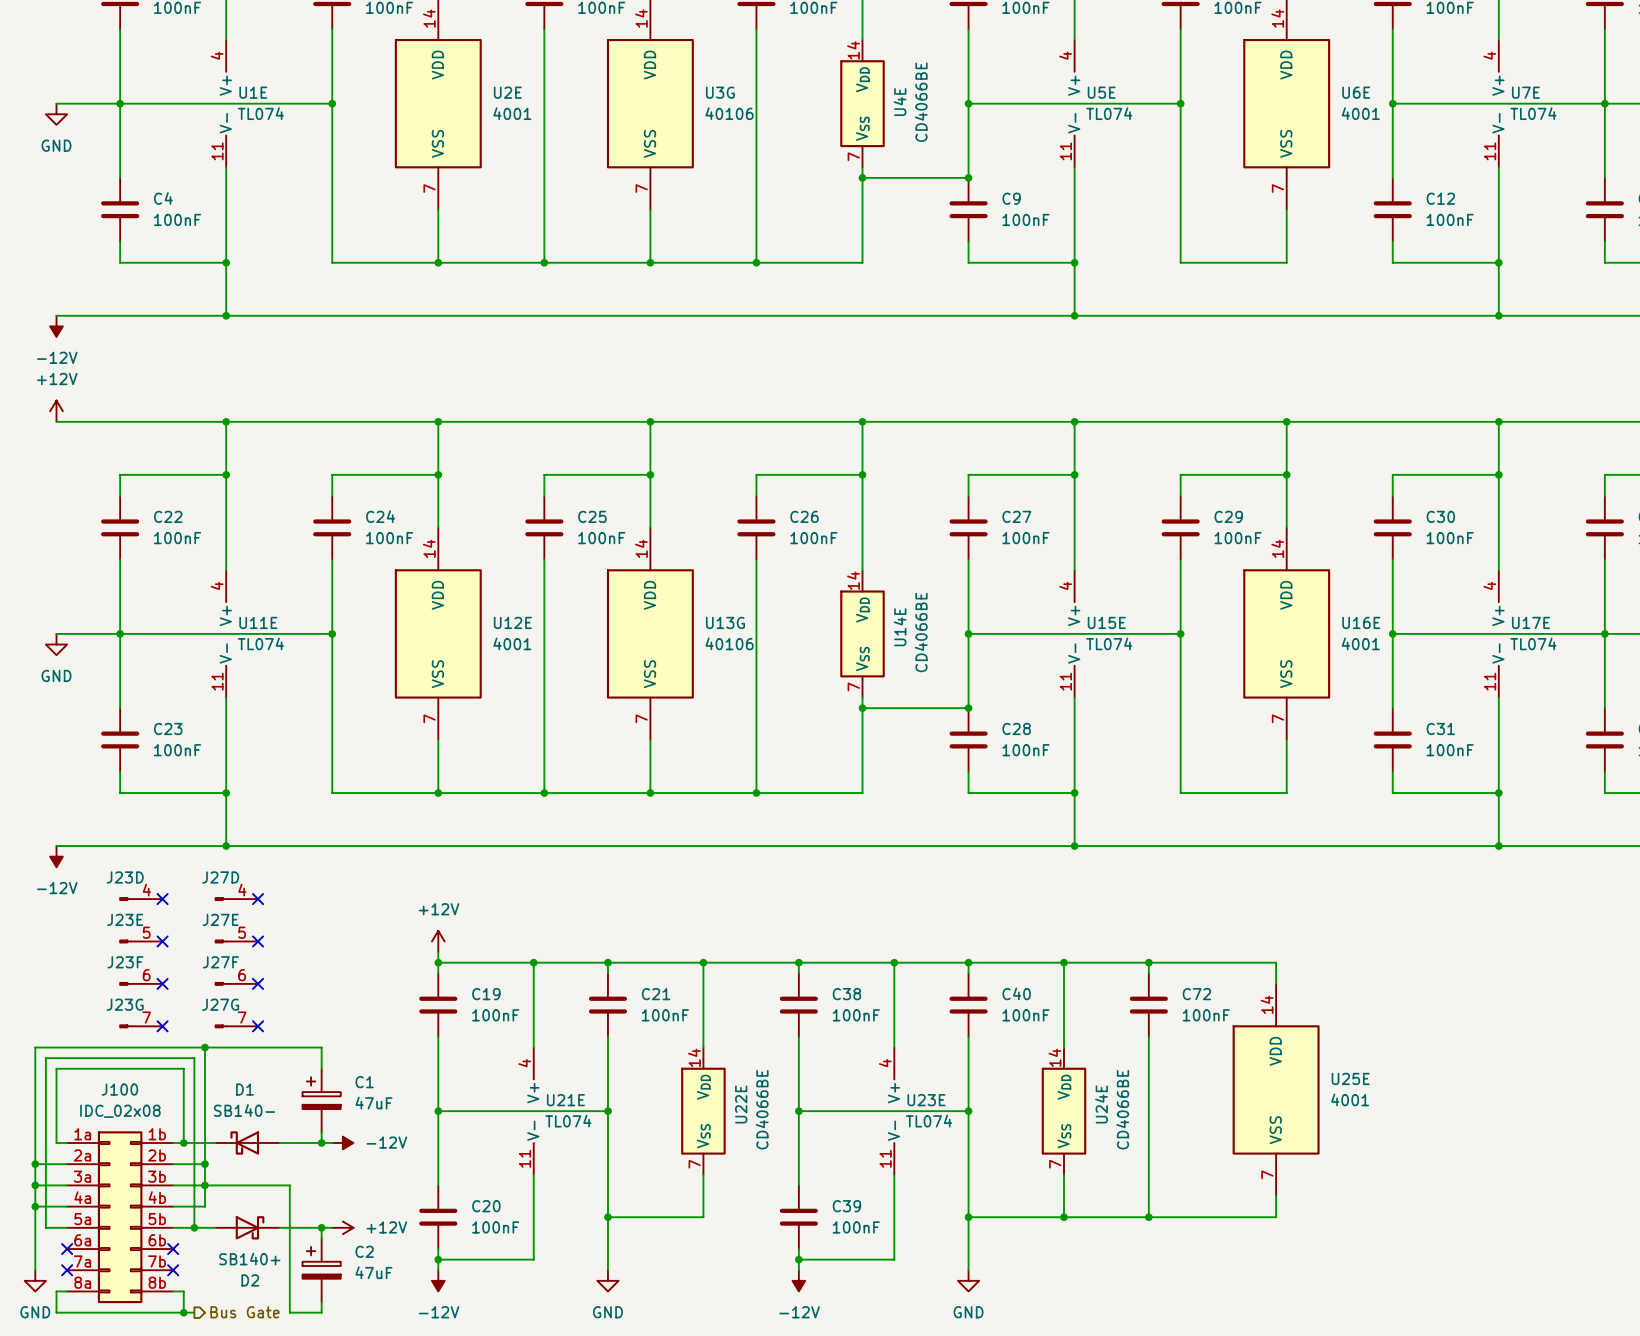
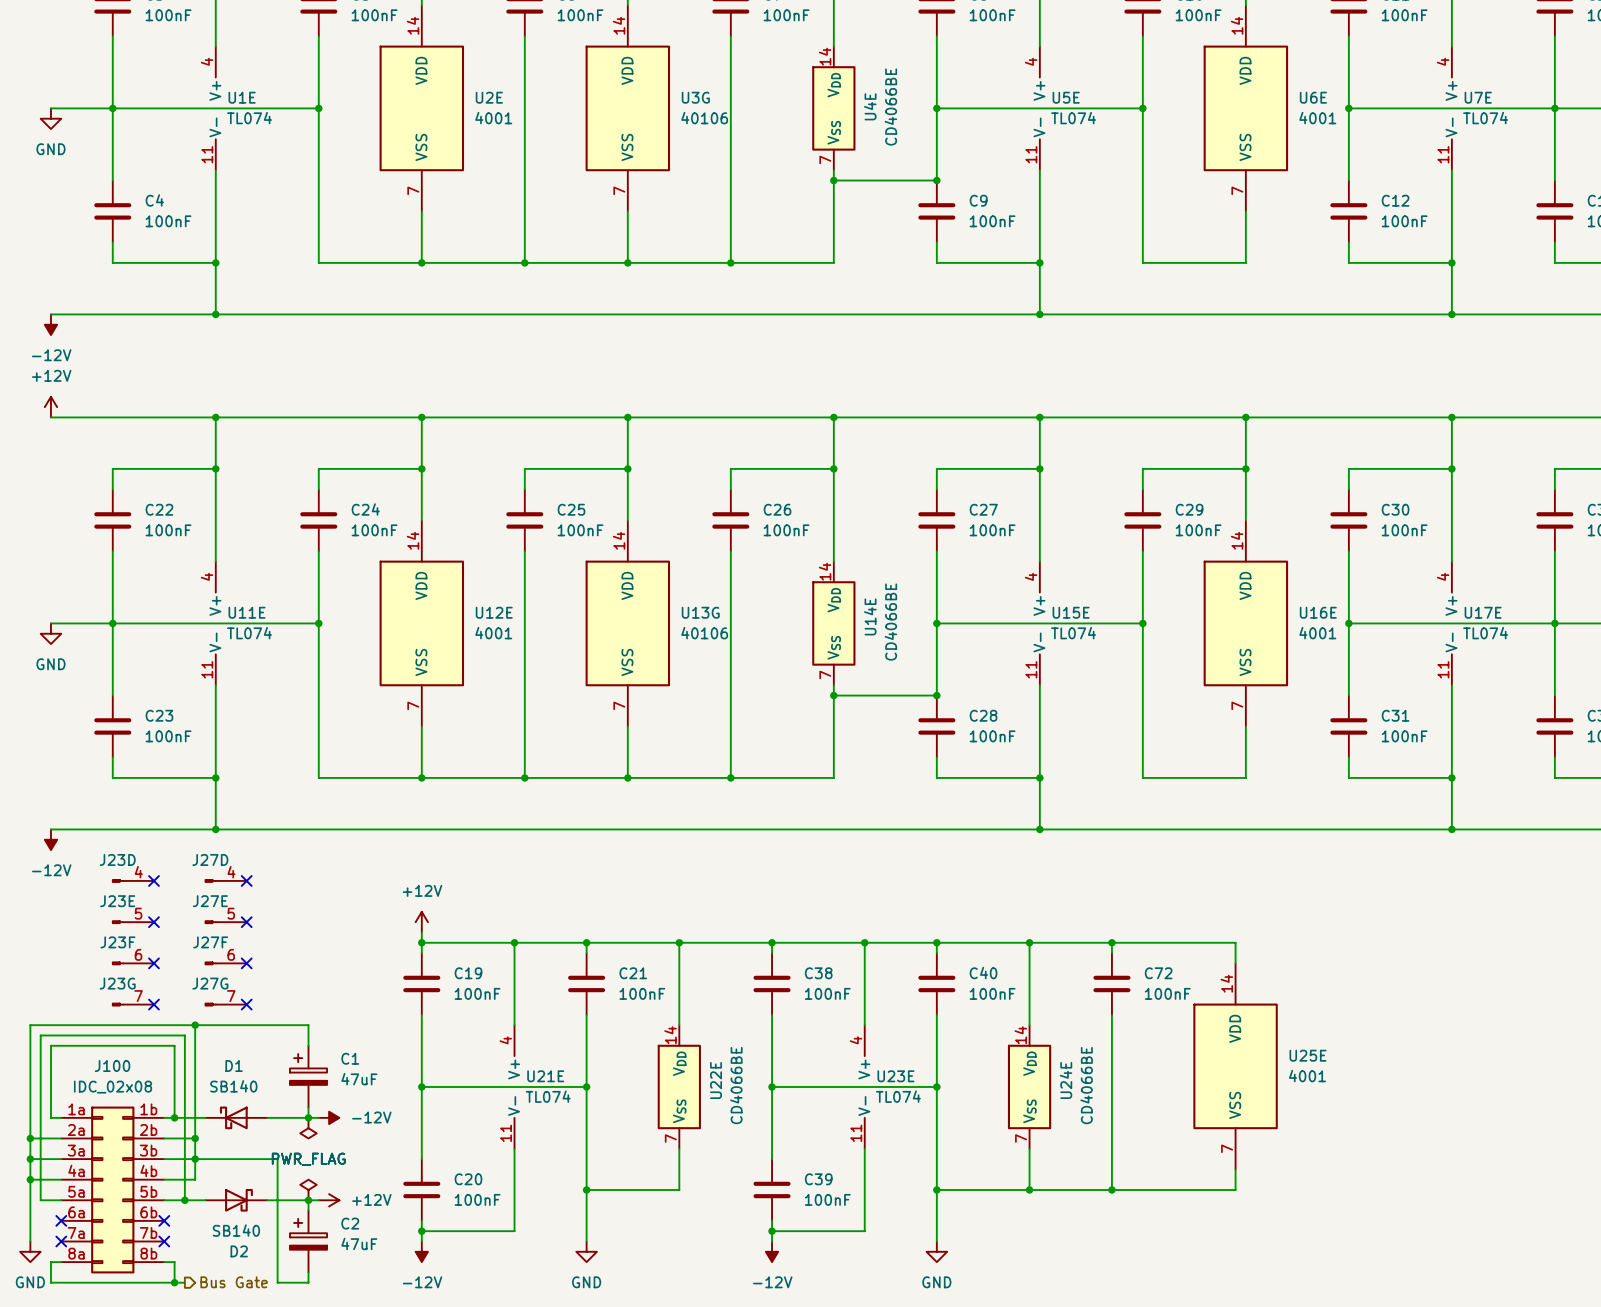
D1 value: SB140- (244, 1110) -> SB140 (233, 1086)
power symbol: none -> PWR_FLAG (308, 1128)
power symbol: none -> PWR_FLAG (308, 1189)
D2 value: SB140+ (249, 1258) -> SB140 (236, 1230)

